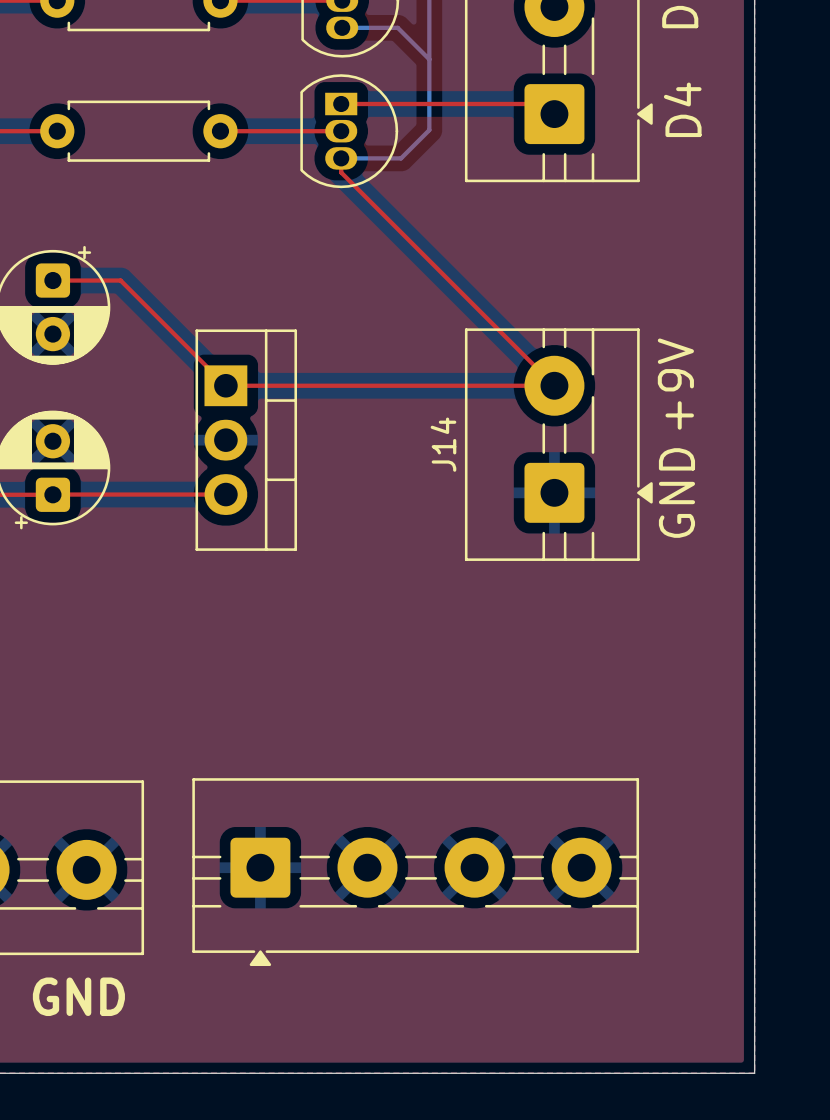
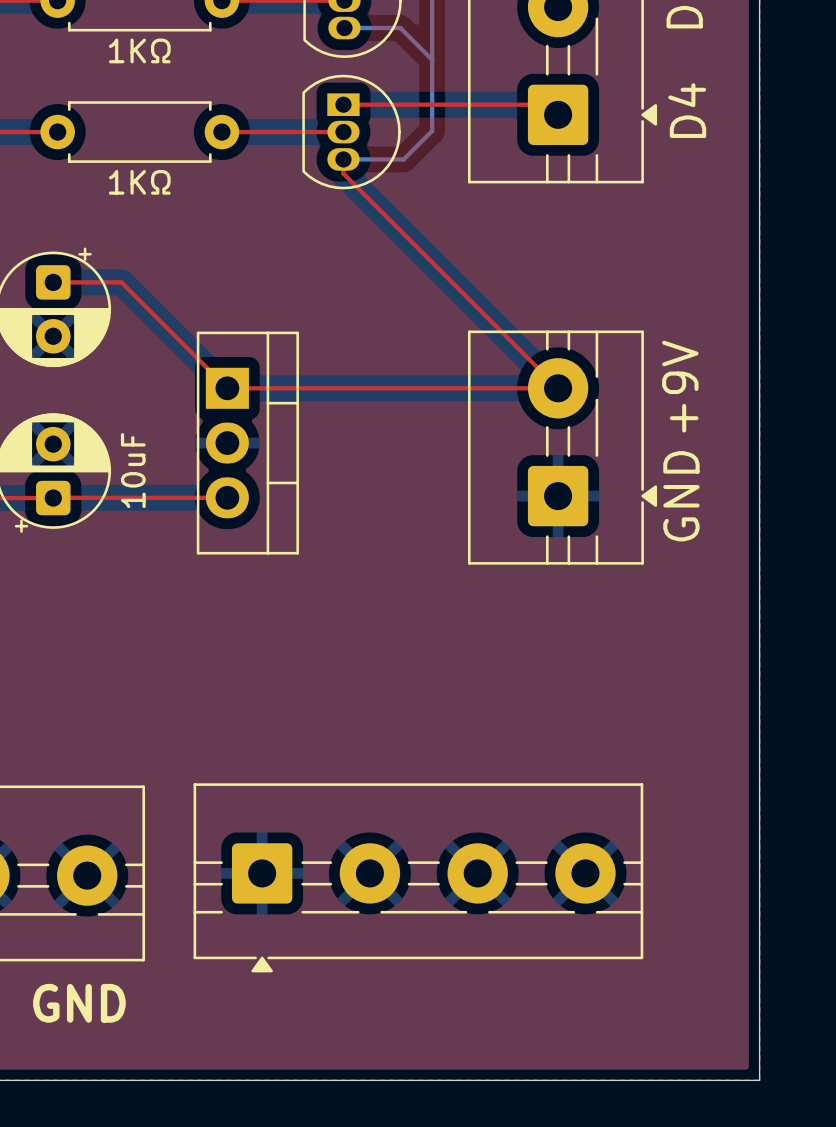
part value: none -> 1KΩ (139, 50)
part value: none -> 1KΩ (139, 182)
J14 name: J14 (443, 444) -> none
part value: none -> 10uF (133, 470)

